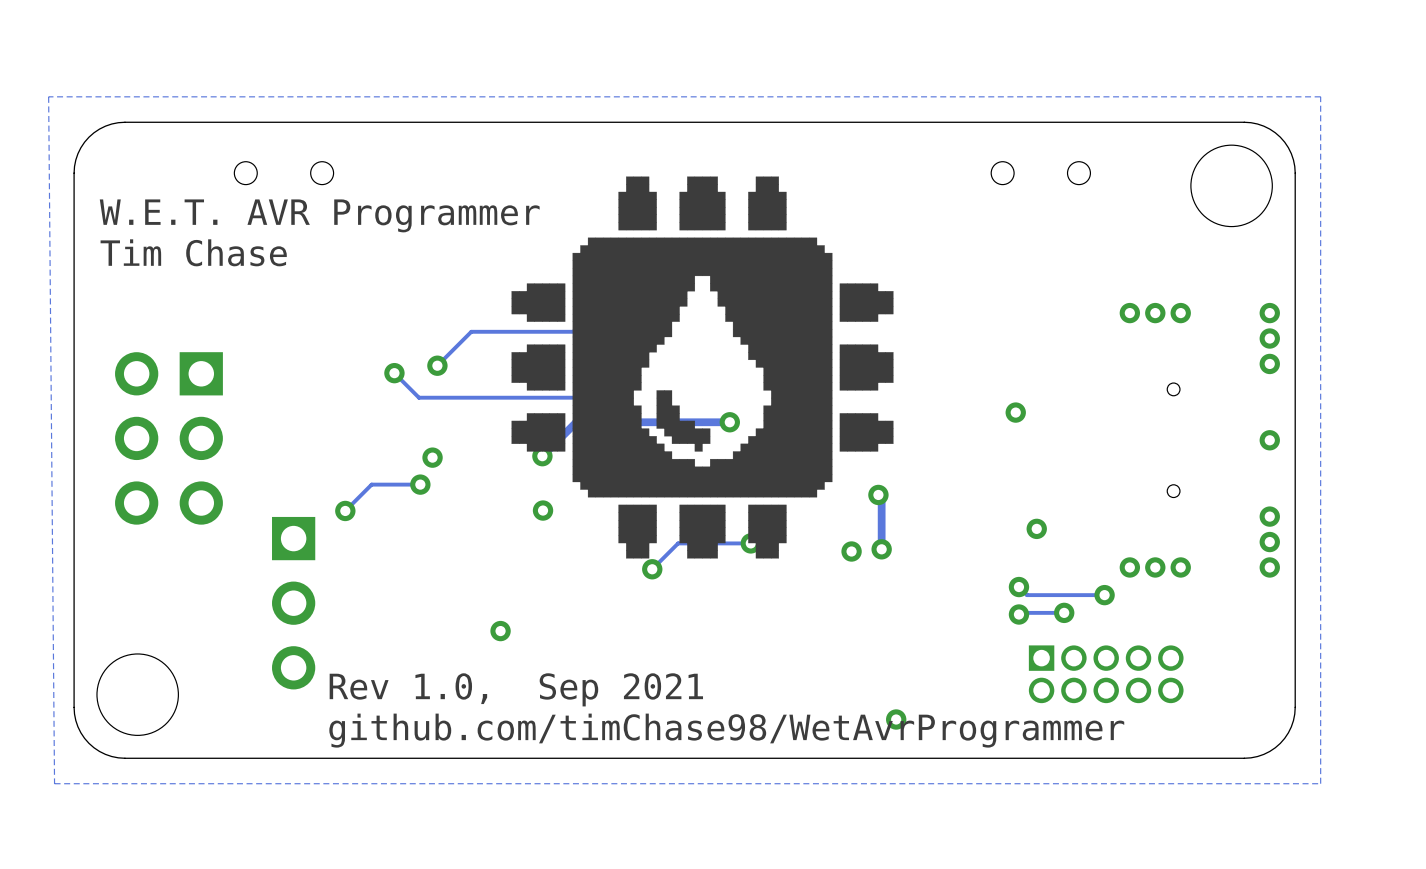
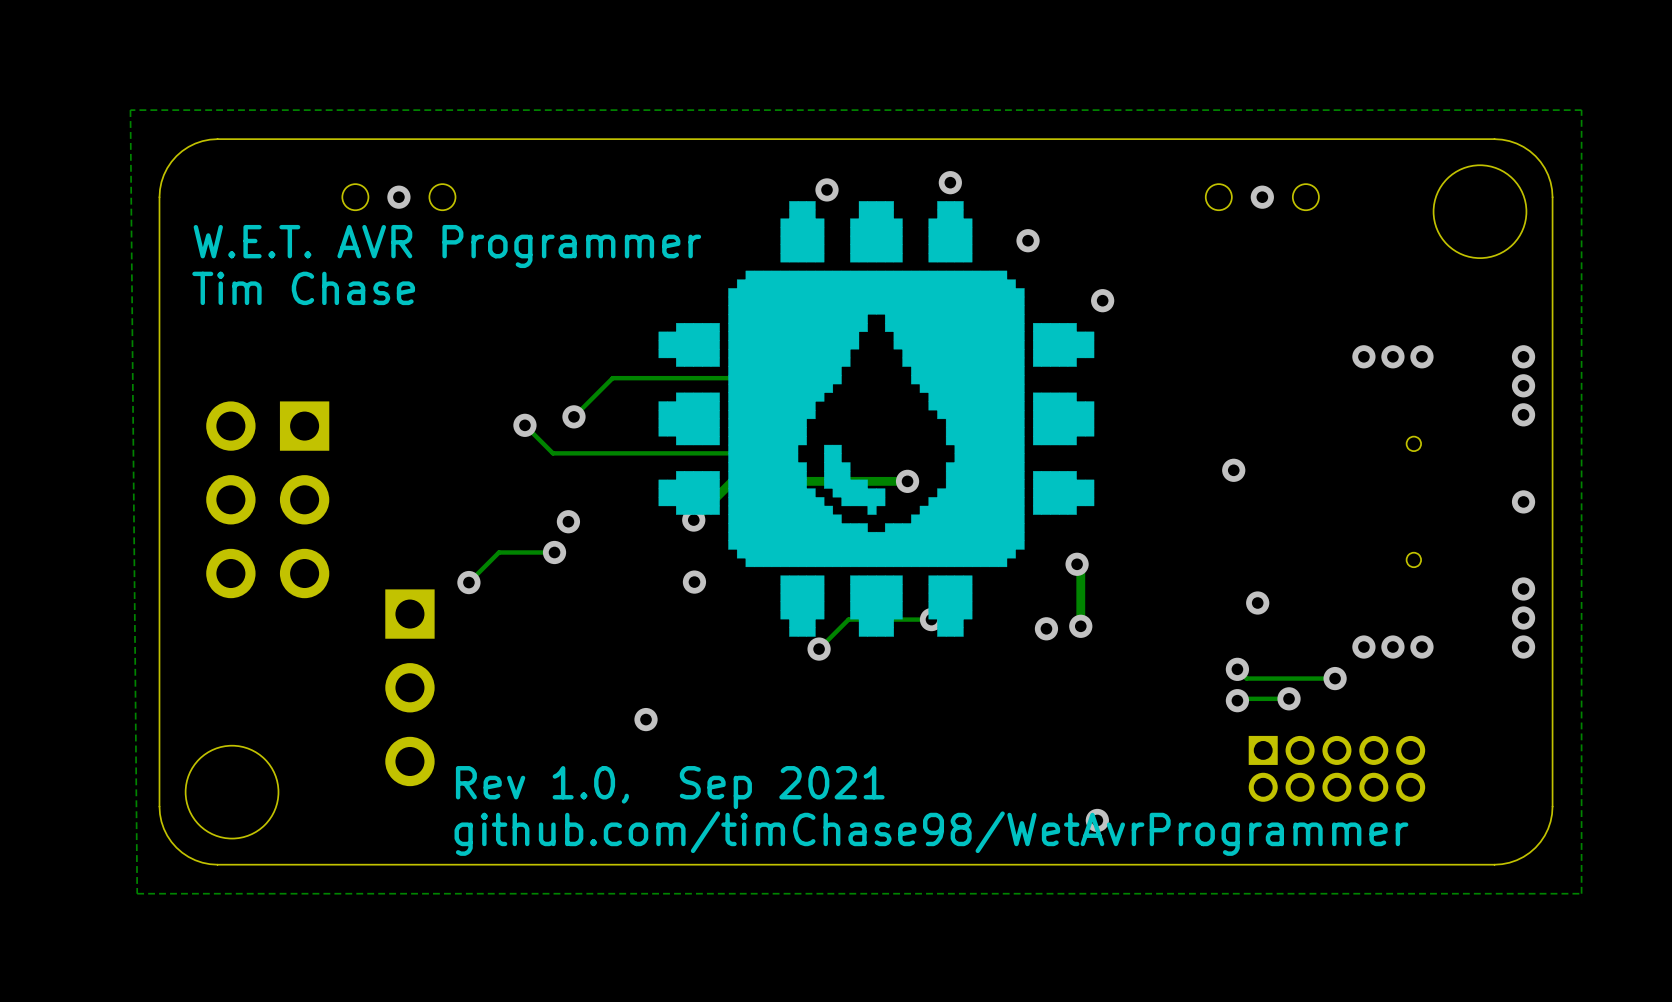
via: none -> (950, 182)
via: none -> (827, 189)
via: none -> (398, 197)
via: none -> (1262, 197)
via: none -> (1028, 240)
via: none -> (1102, 300)

